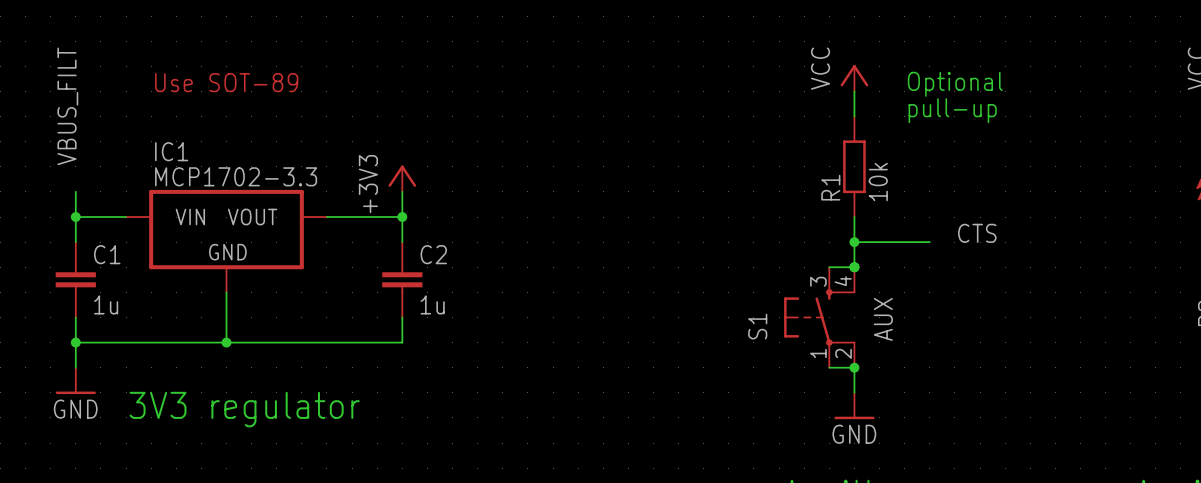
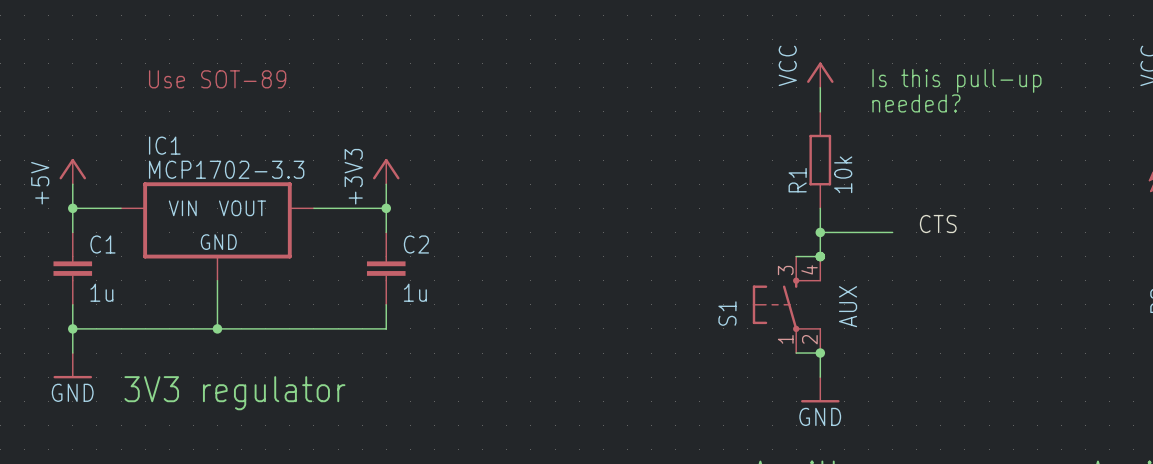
text: Optional (955, 84) -> Is this pull-up (956, 80)
label: VBUS_FILT (67, 106) -> none
text: pull-up (952, 110) -> needed? (916, 103)
power symbol: none -> +5V (72, 171)

